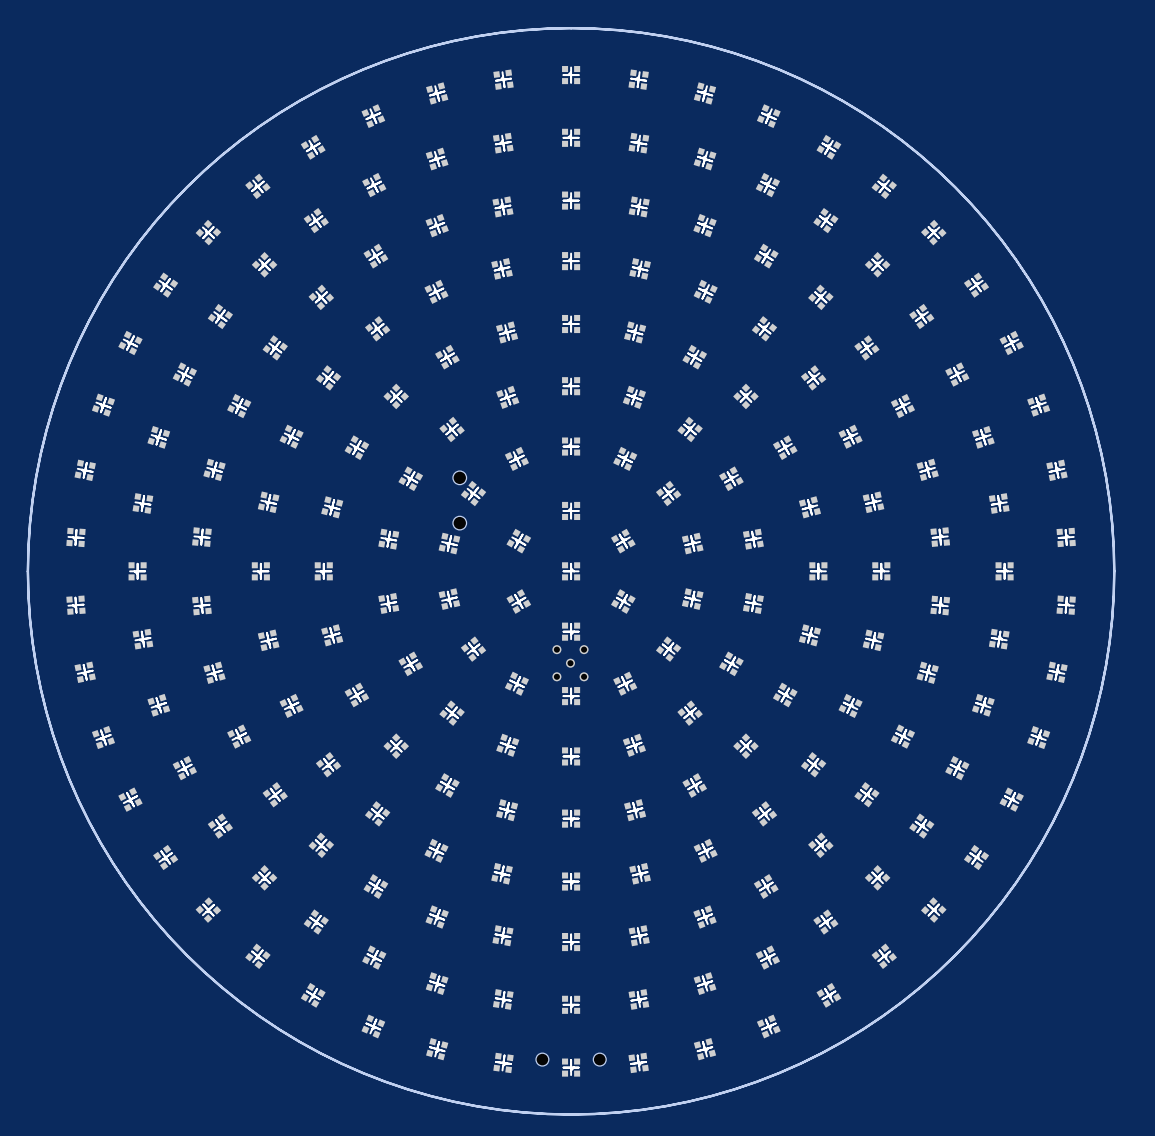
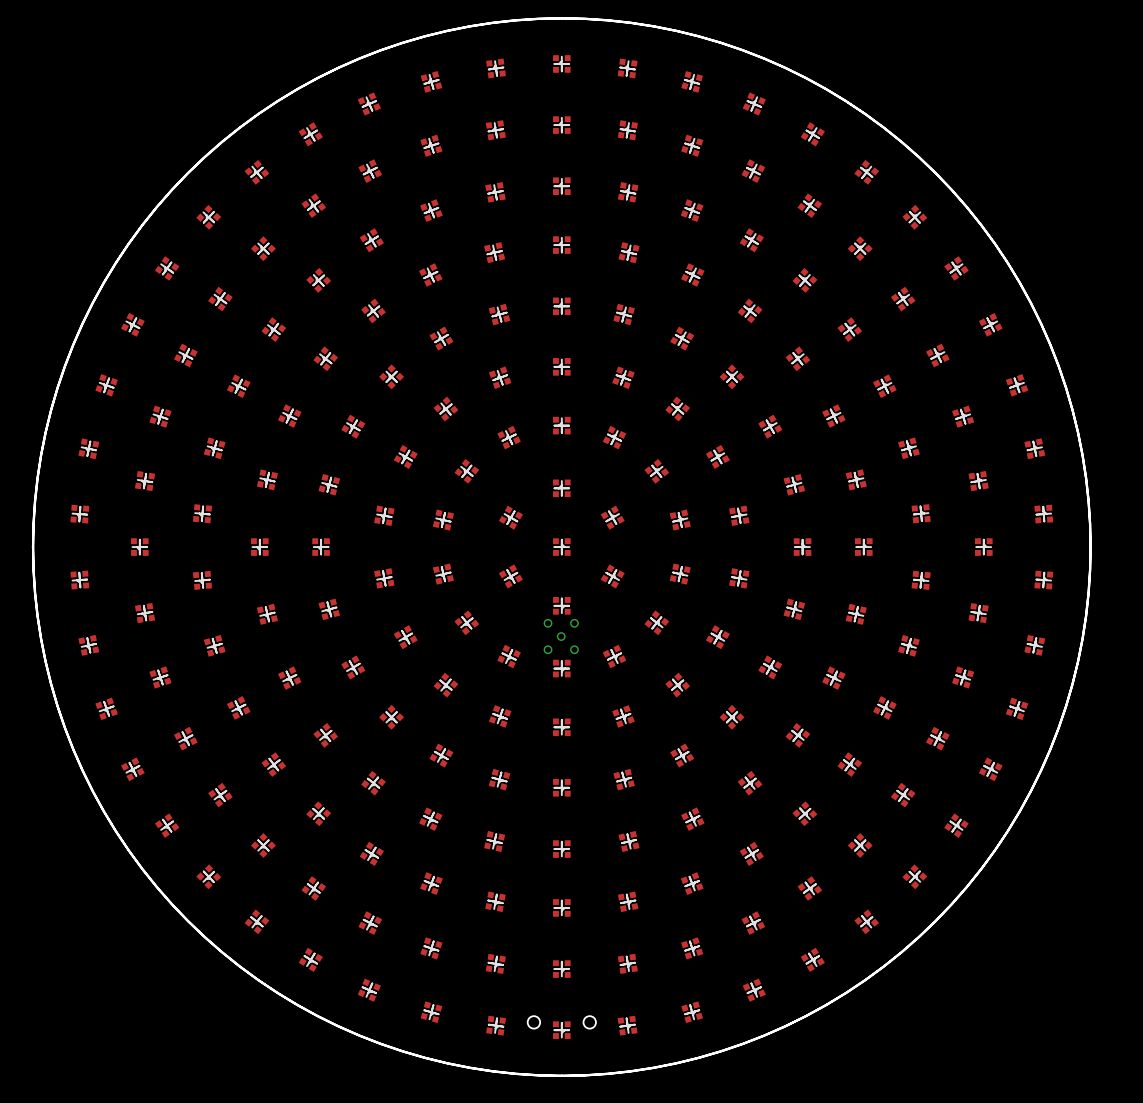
part: (459, 500) -> none

